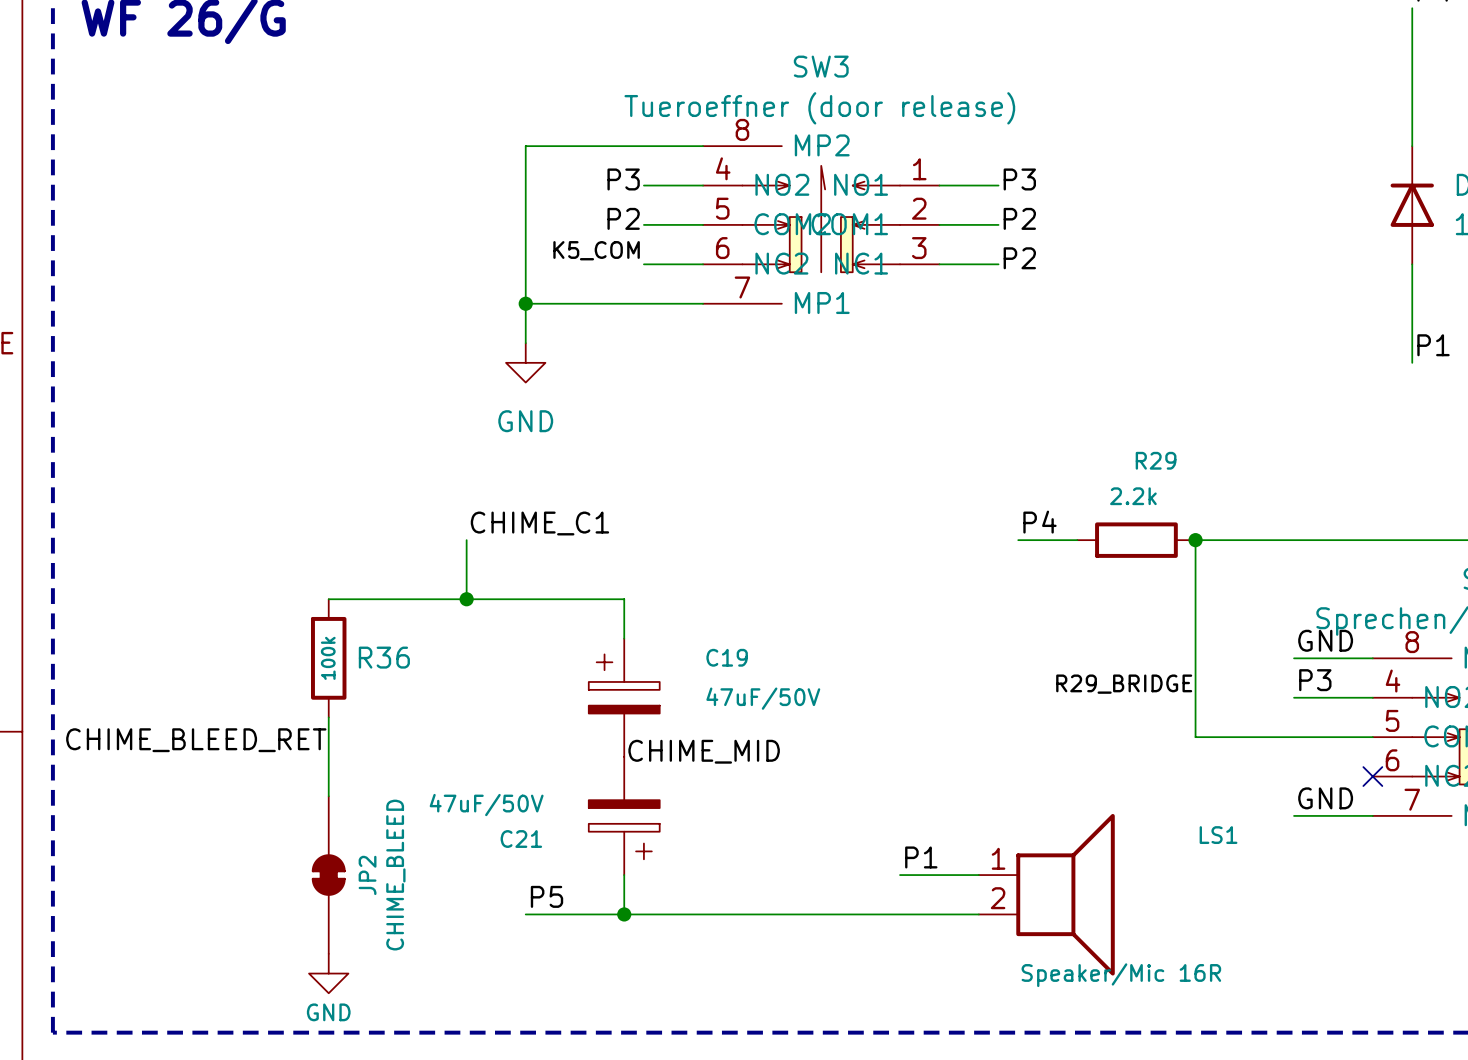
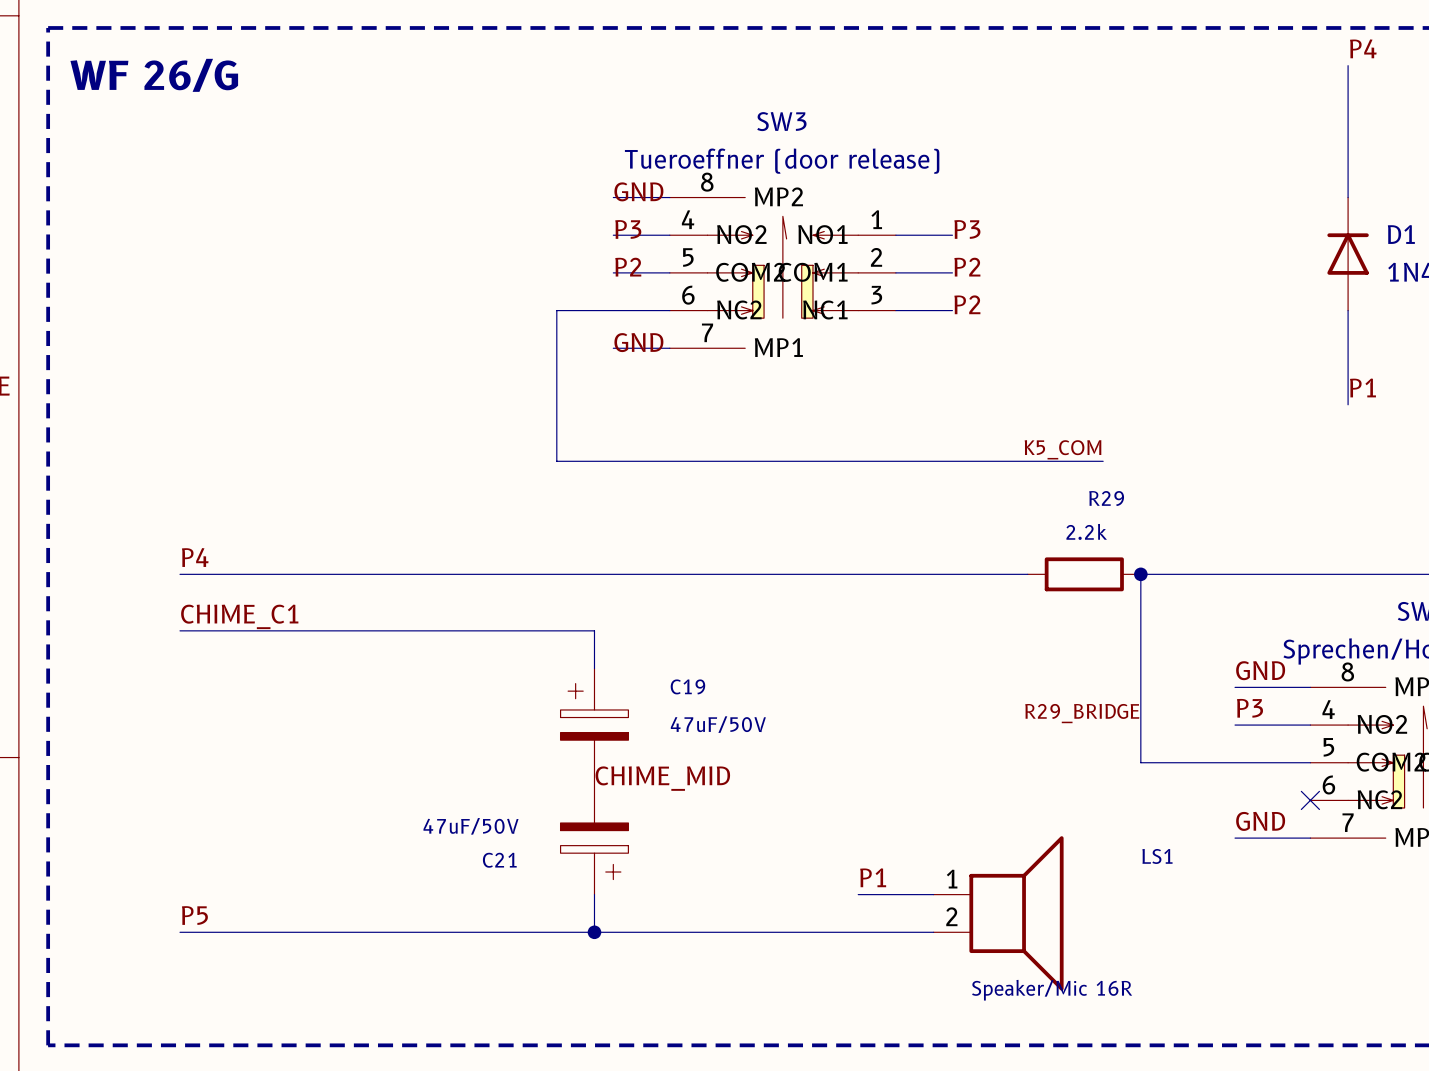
label: none -> GND (638, 191)
wire: (643, 146) (525, 146) (525, 343) -> none
label position: P3 (623, 179) -> P3 (628, 229)
label position: P2 (623, 218) -> P2 (628, 267)
label: K5_COM (596, 250) -> none
wire: none -> (613, 310) (556, 310) (556, 461) (1103, 461)
label: none -> GND (638, 342)
wire: (525, 303) (643, 303) -> none
junction: (525, 303) -> none
power symbol: GND (525, 362) -> none
label: none -> K5_COM (1063, 449)
label: none -> P4 (195, 557)
label: P4 (1039, 522) -> none
label position: CHIME_C1 (539, 523) -> CHIME_C1 (239, 616)
wire: none -> (180, 574) (971, 574)
wire: (466, 540) (466, 599) -> none
wire: none -> (180, 630) (311, 630)
junction: (466, 599) -> none
R36: 100k (328, 658) -> none
wire: (328, 717) (328, 796) -> none
label: CHIME_BLEED_RET (196, 740) -> none
JP2: CHIME_BLEED (328, 875) -> none
label position: P5 (546, 896) -> P5 (194, 915)
wire: none -> (180, 932) (500, 932)
power symbol: GND (328, 973) -> none

